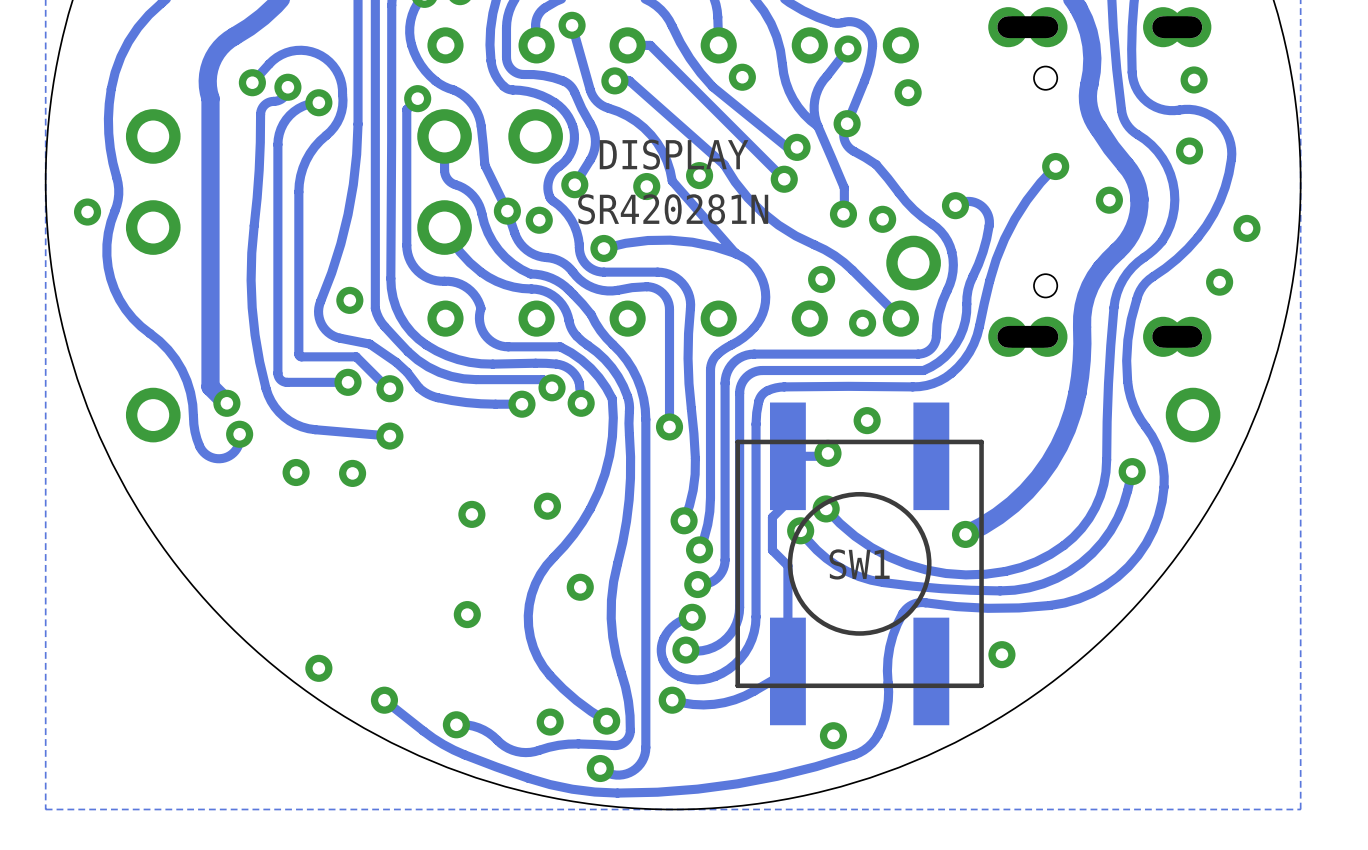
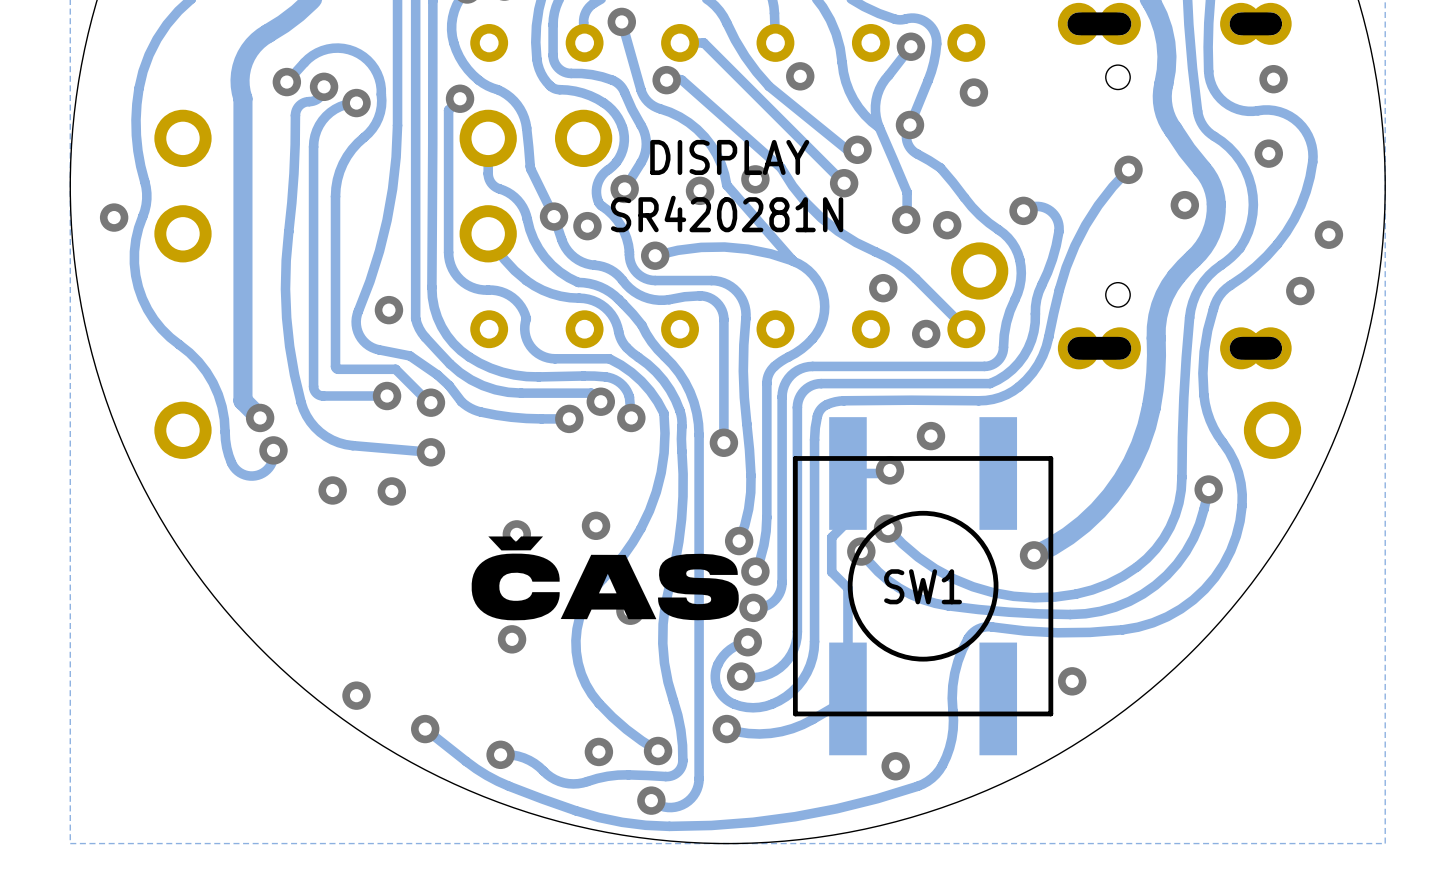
drawing: none -> [471, 536, 739, 621]

